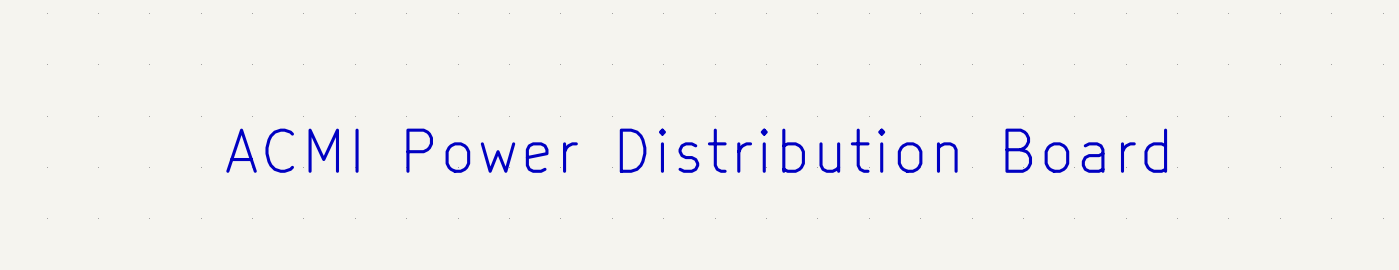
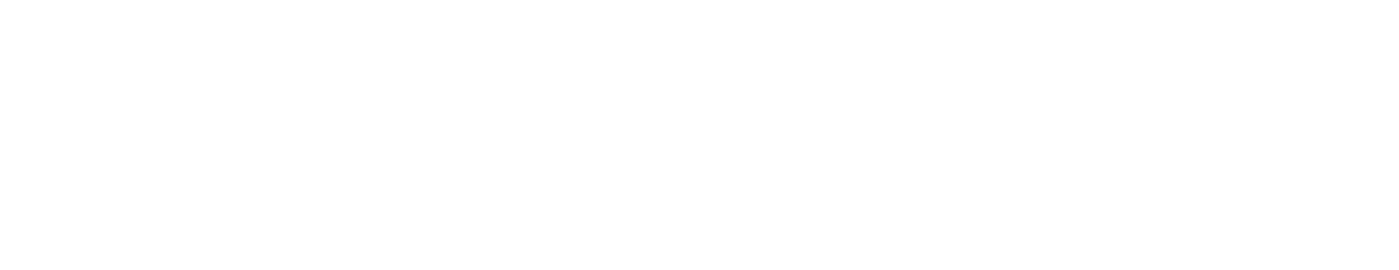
text: ACMI Power Distribution Board (696, 150) -> none

